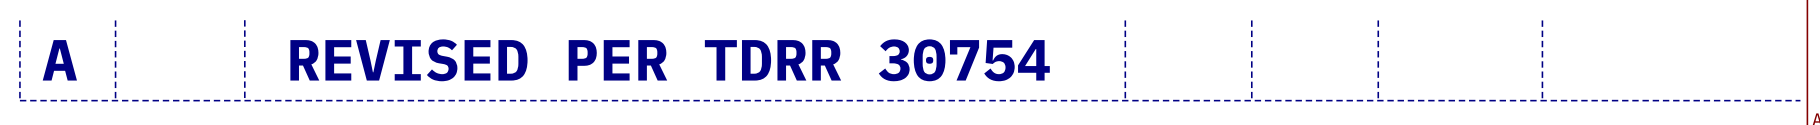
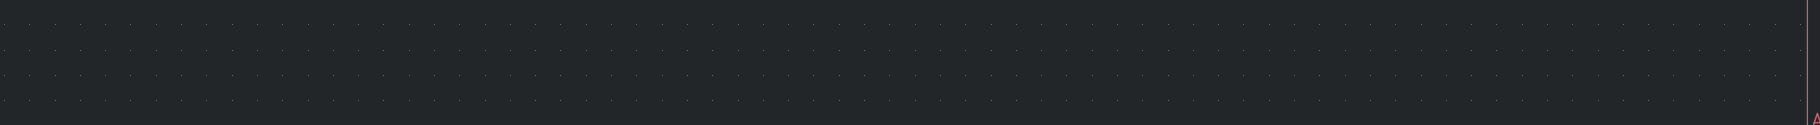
line: (19, 20) (19, 100) (1800, 100) -> none
line: (115, 20) (115, 100) -> none
line: (244, 20) (244, 100) -> none
line: (1125, 20) (1125, 100) -> none
line: (1251, 20) (1251, 100) -> none
line: (1378, 20) (1378, 100) -> none
line: (1542, 20) (1542, 100) -> none
text: A REVISED PER TDRR 30754 (546, 60) -> none

